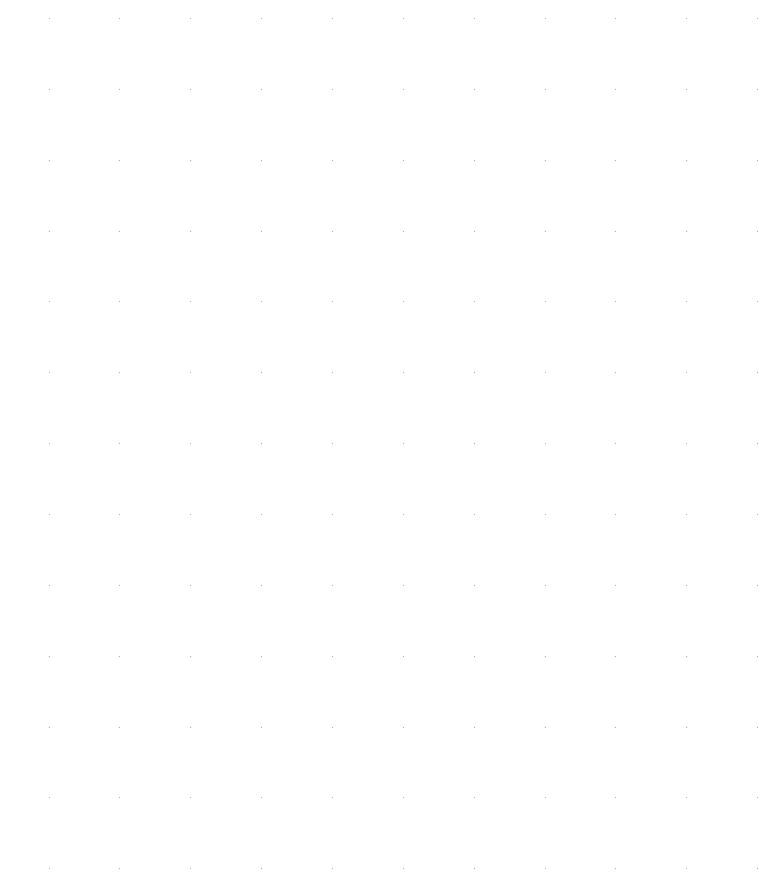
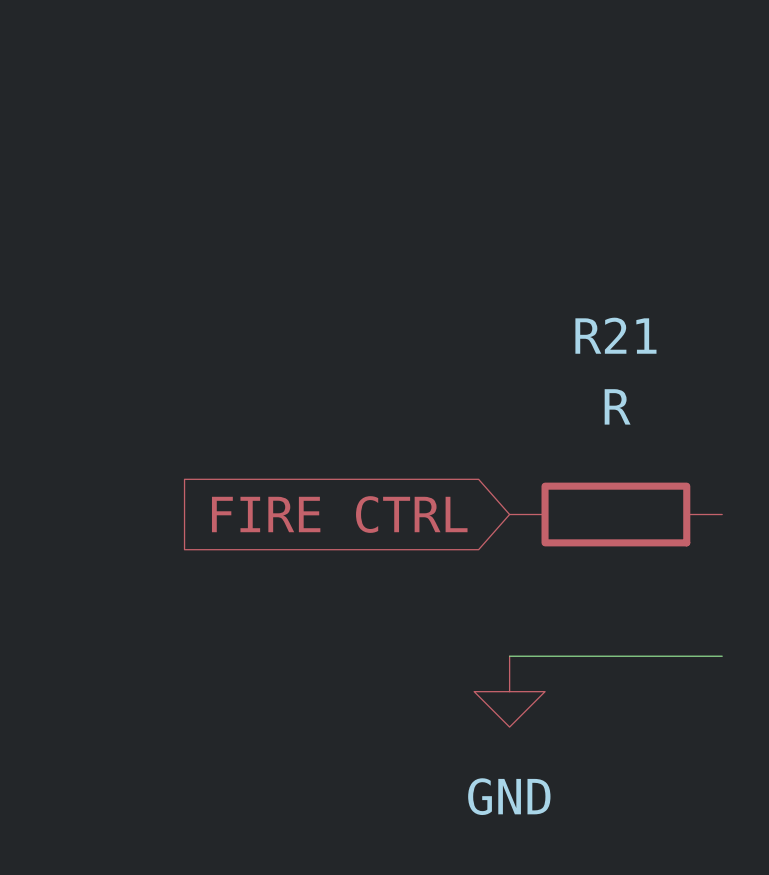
global label: none -> FIRE CTRL (339, 514)
R21: none -> R (615, 514)
wire: none -> (509, 656) (722, 656)
power symbol: none -> GND (509, 691)

